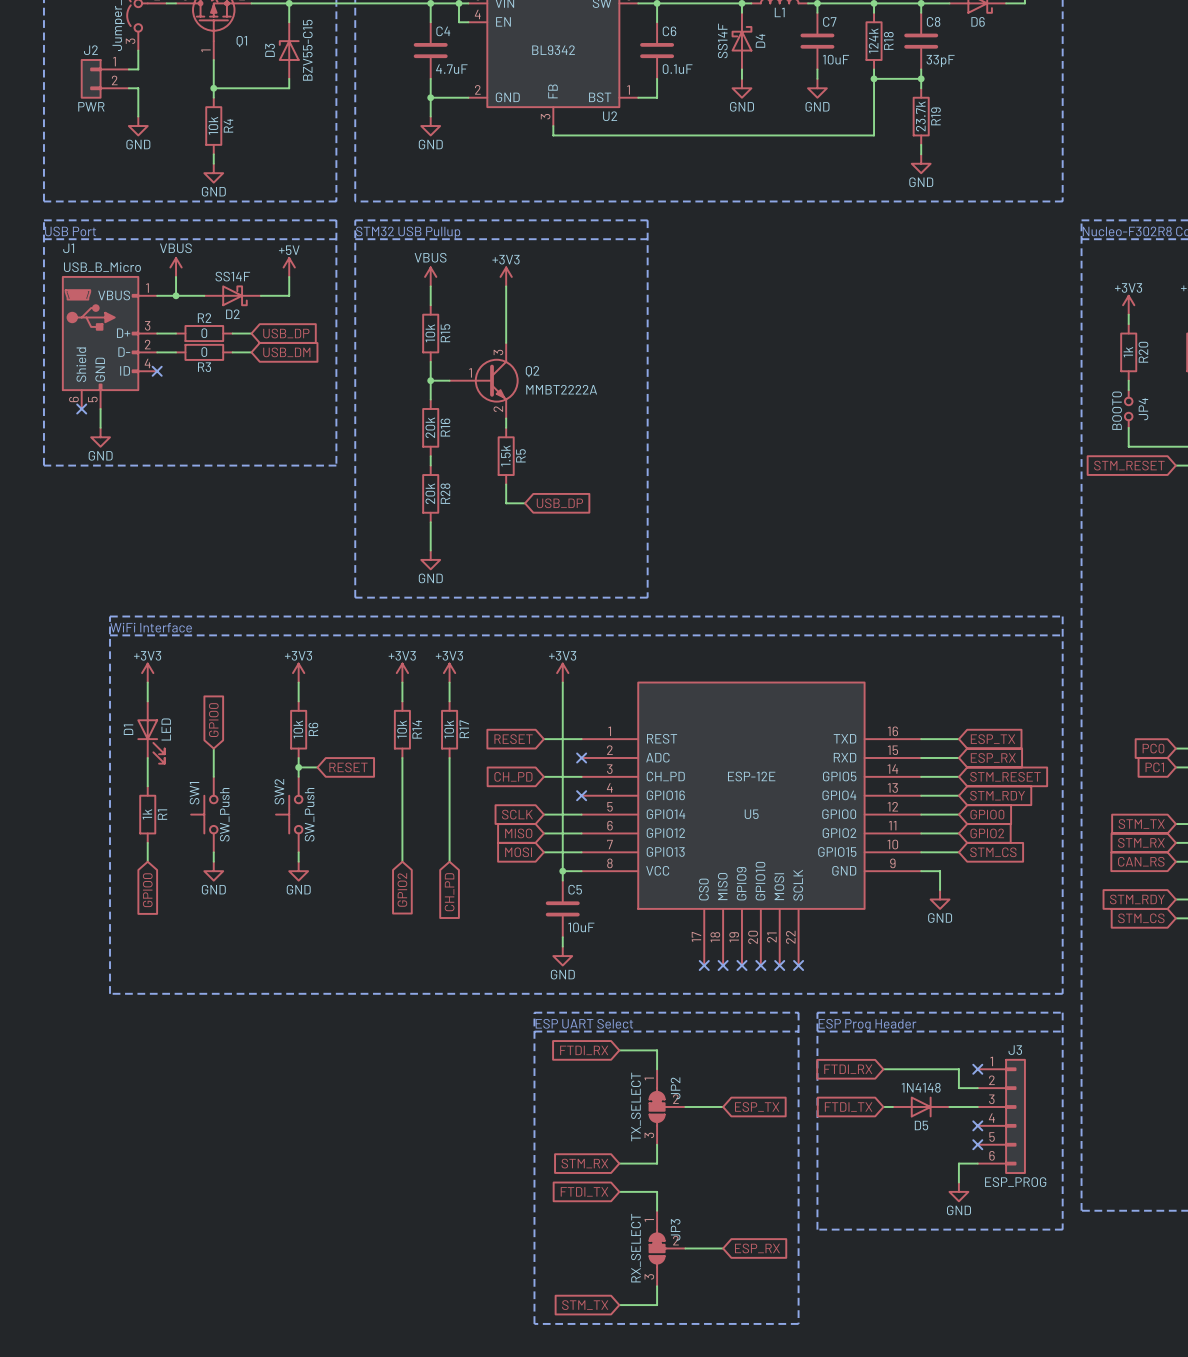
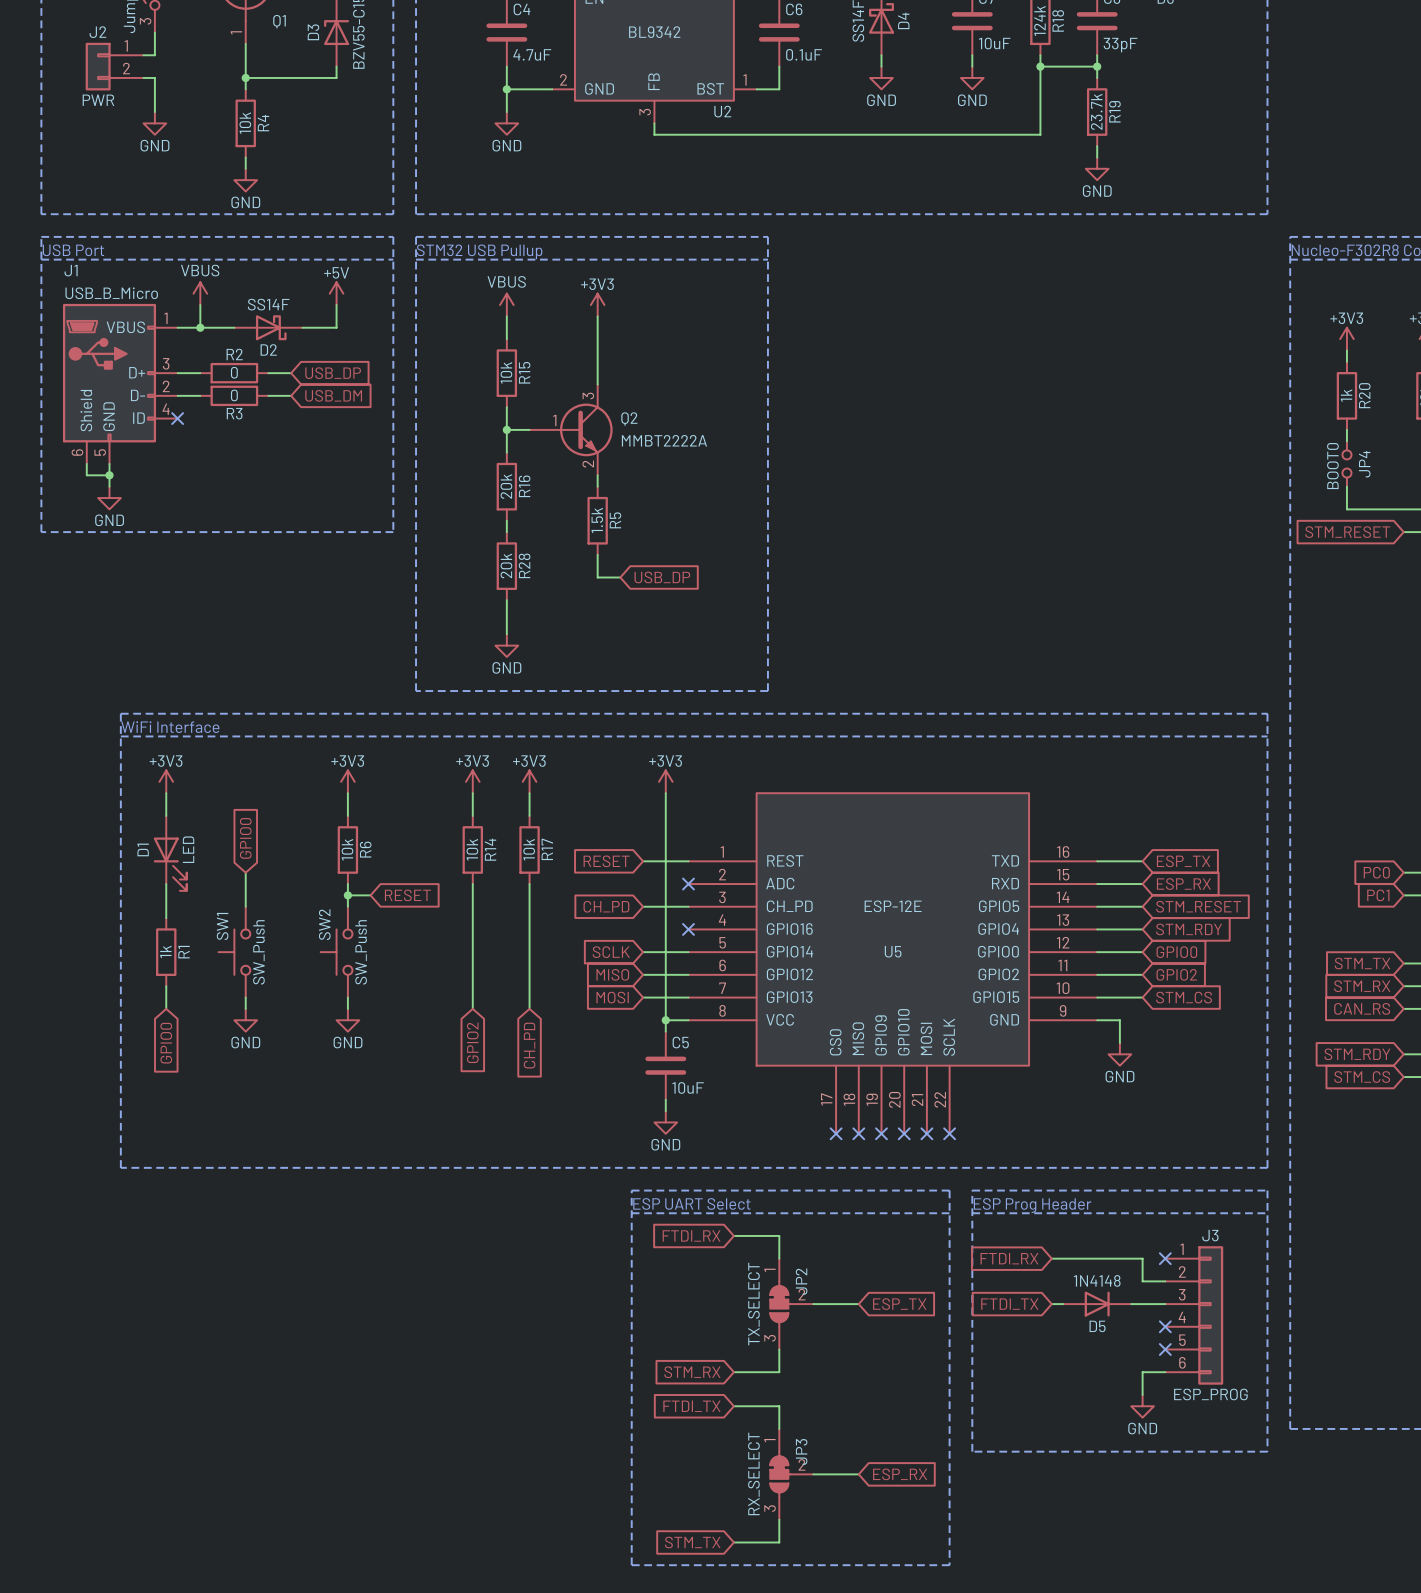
wire: none -> (86, 463) (86, 475) (109, 475)
no-connect mark: (81, 408) -> none
junction: none -> (109, 475)

